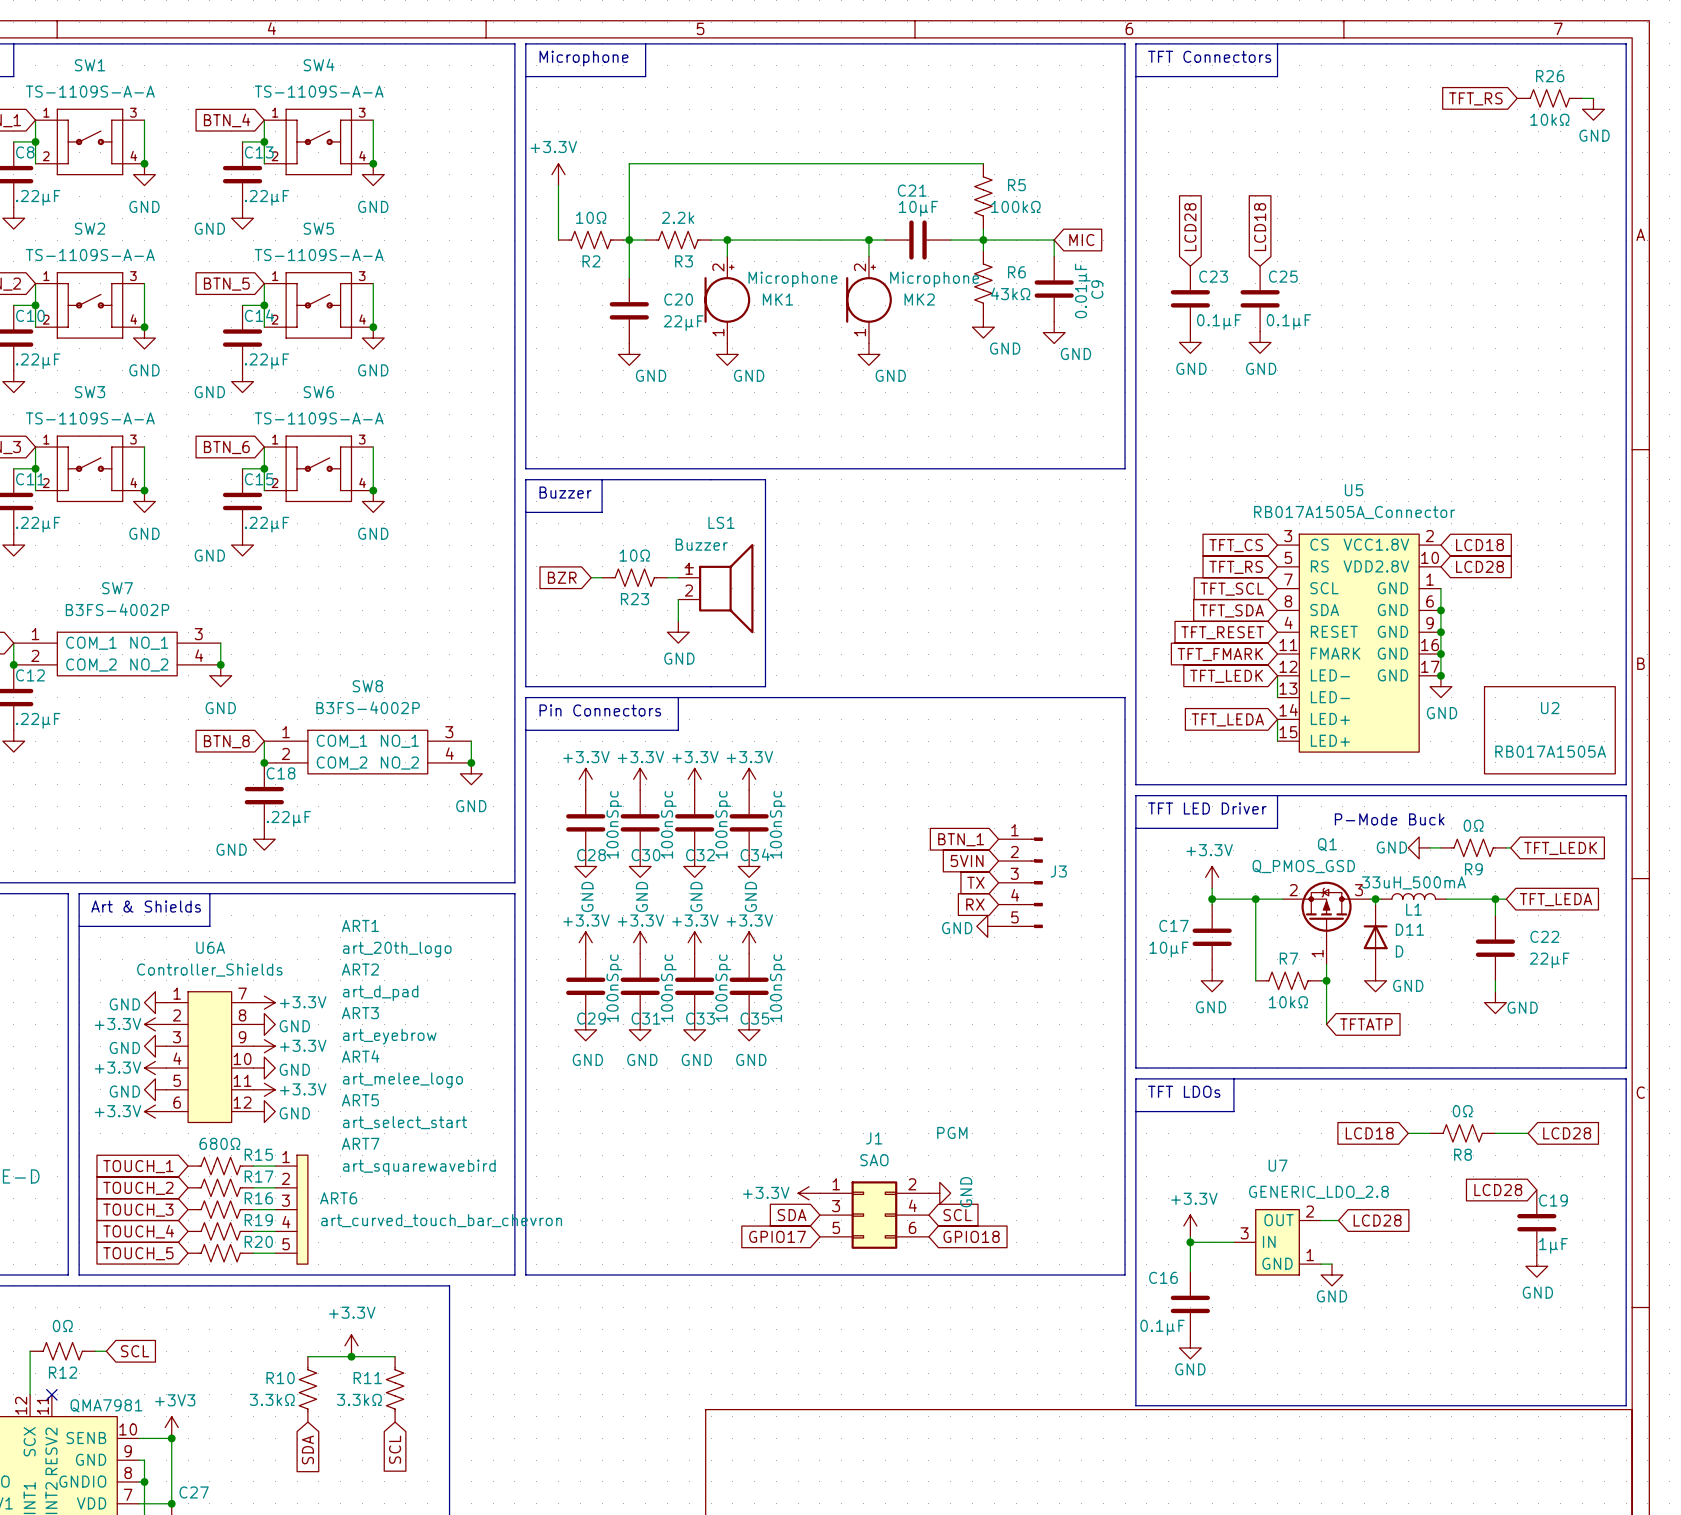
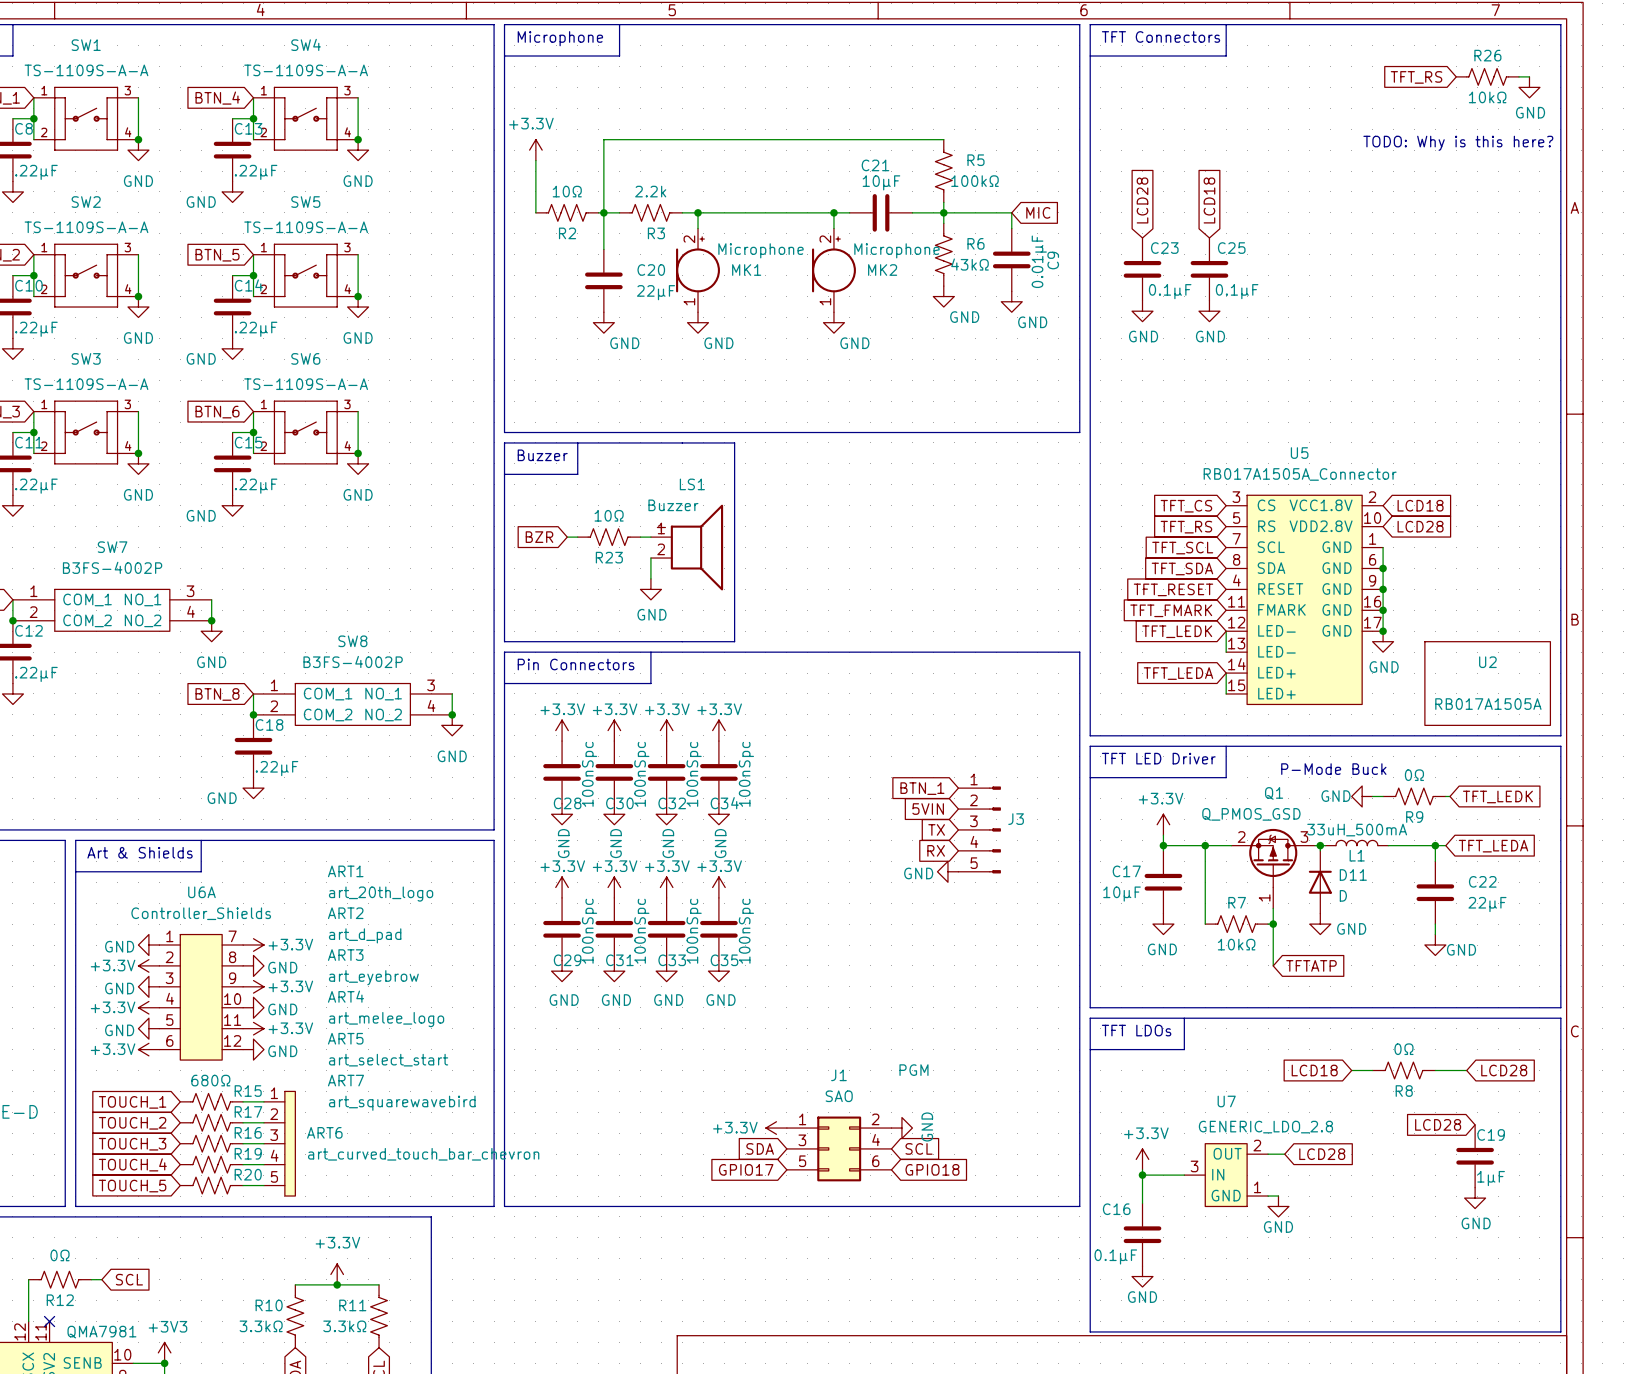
text: none -> TODO: Why is this here? (1458, 143)

